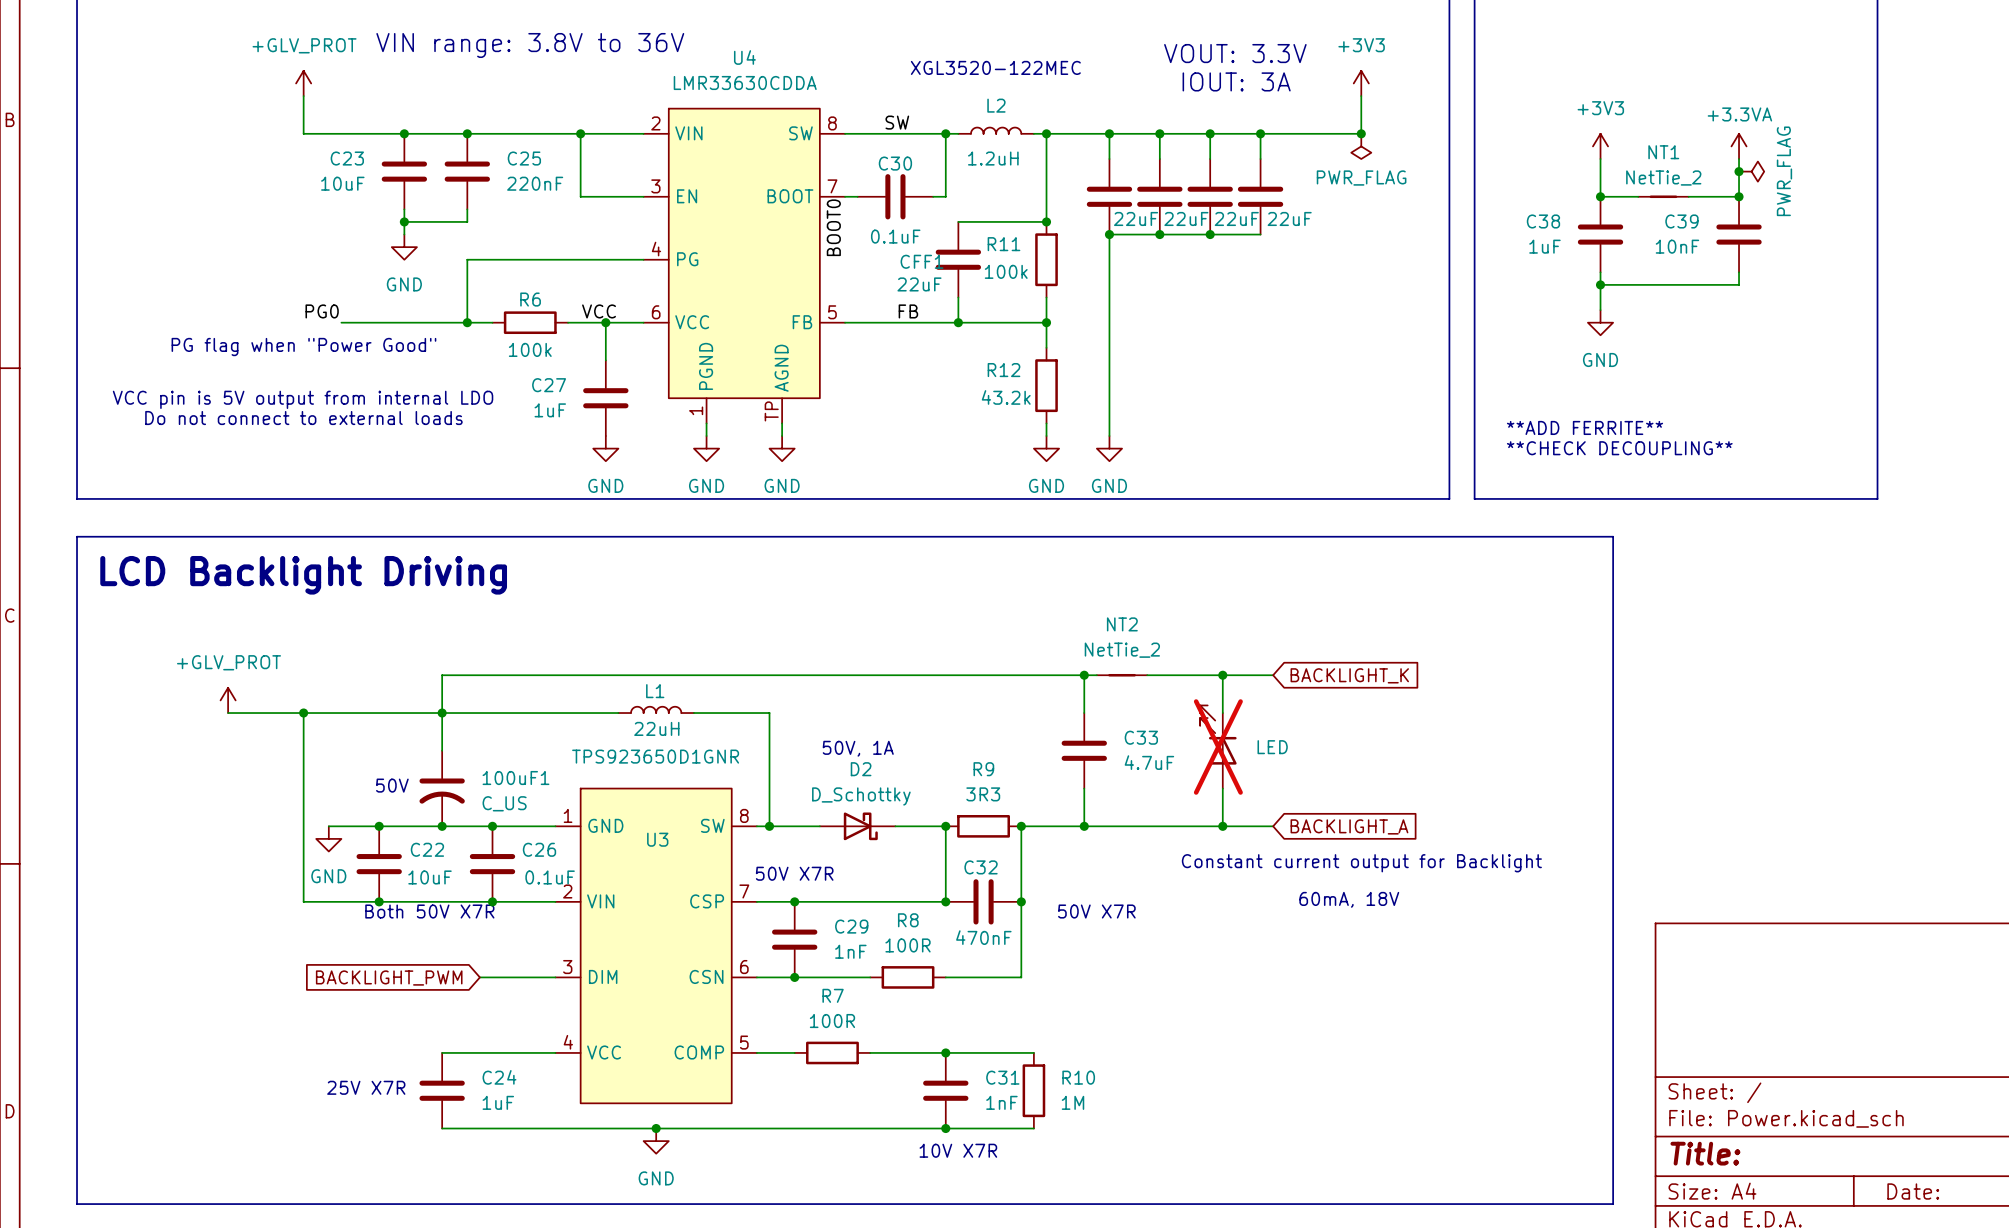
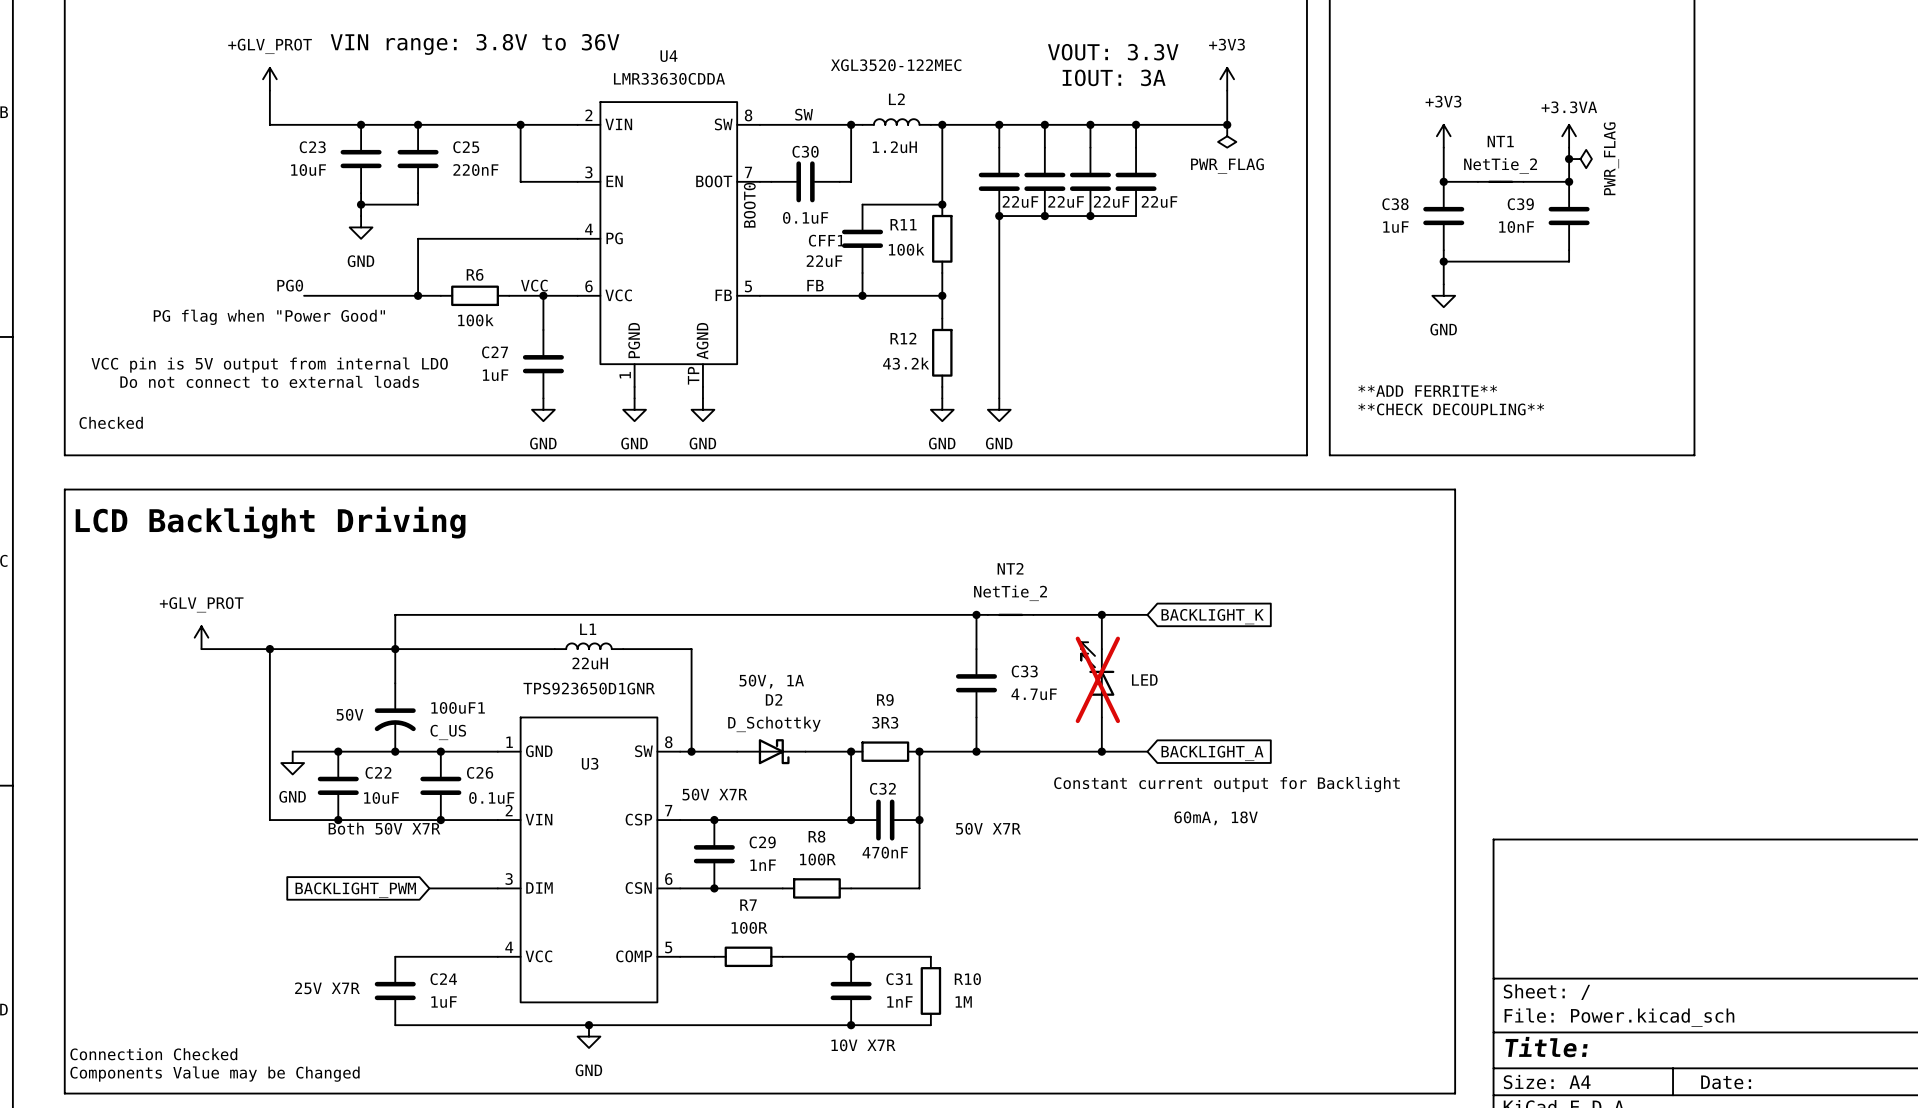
text: none -> Checked (111, 422)
text: none -> Connection Checked (153, 1054)
text: none -> Components Value may be Changed (214, 1074)

